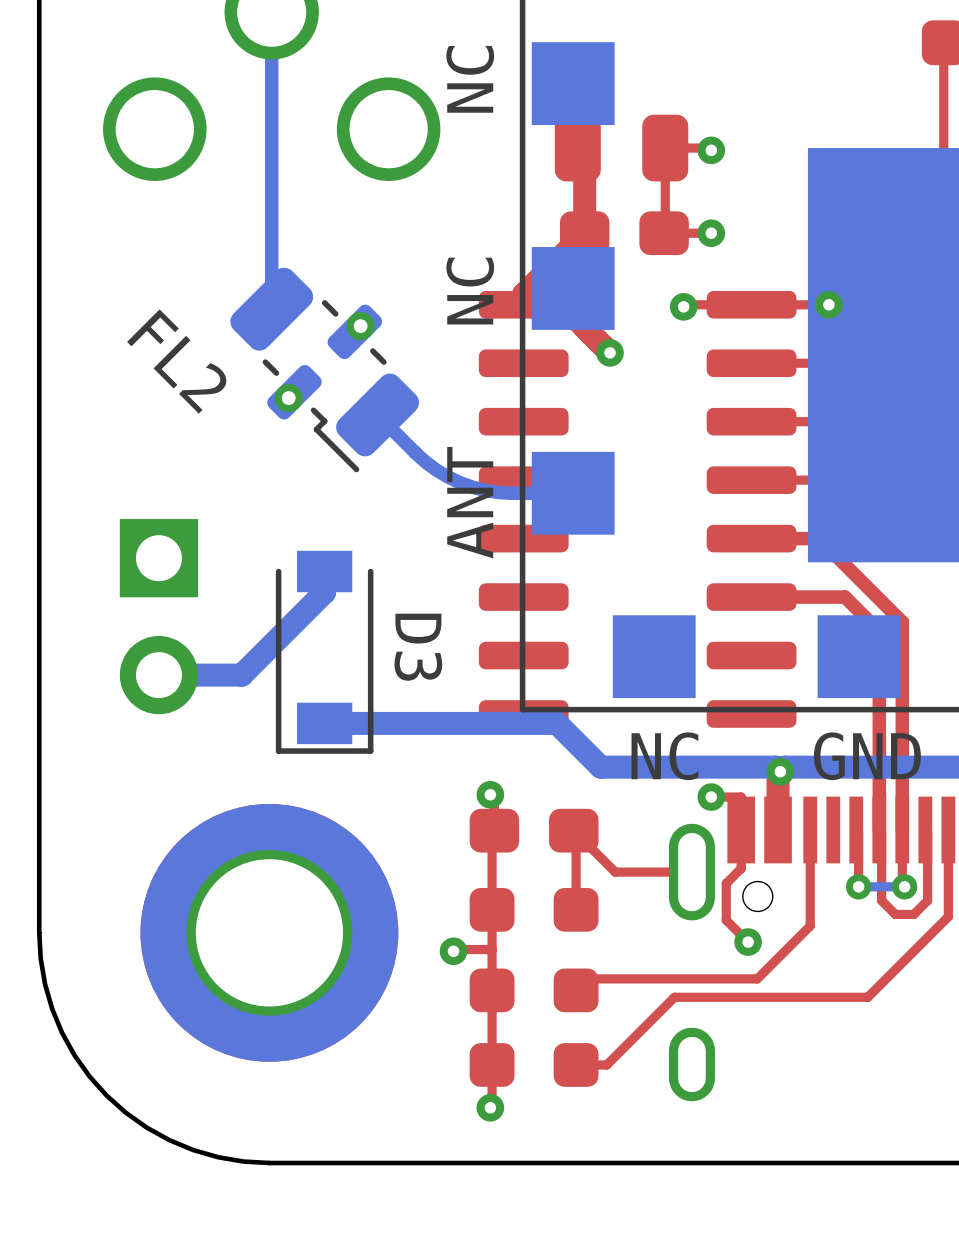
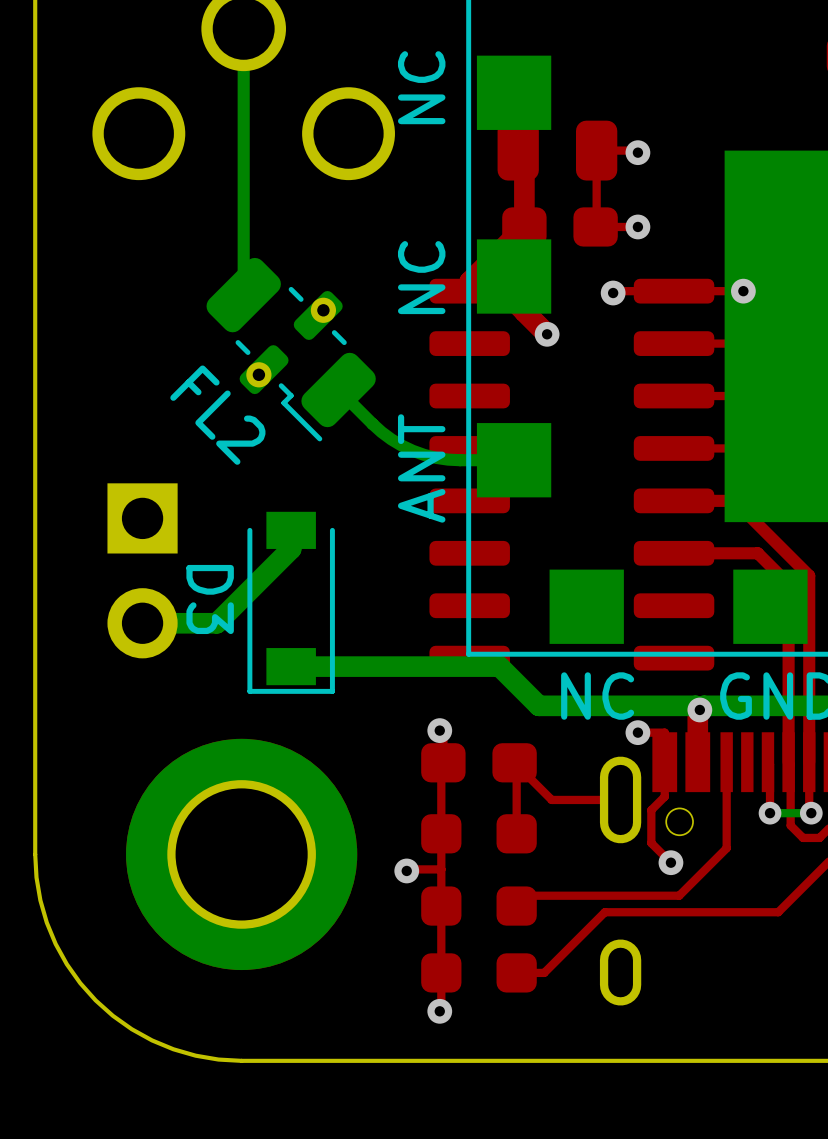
FL2 name position: FL2 (176, 361) -> FL2 (217, 415)
D3 name position: D3 (418, 647) -> D3 (210, 599)

